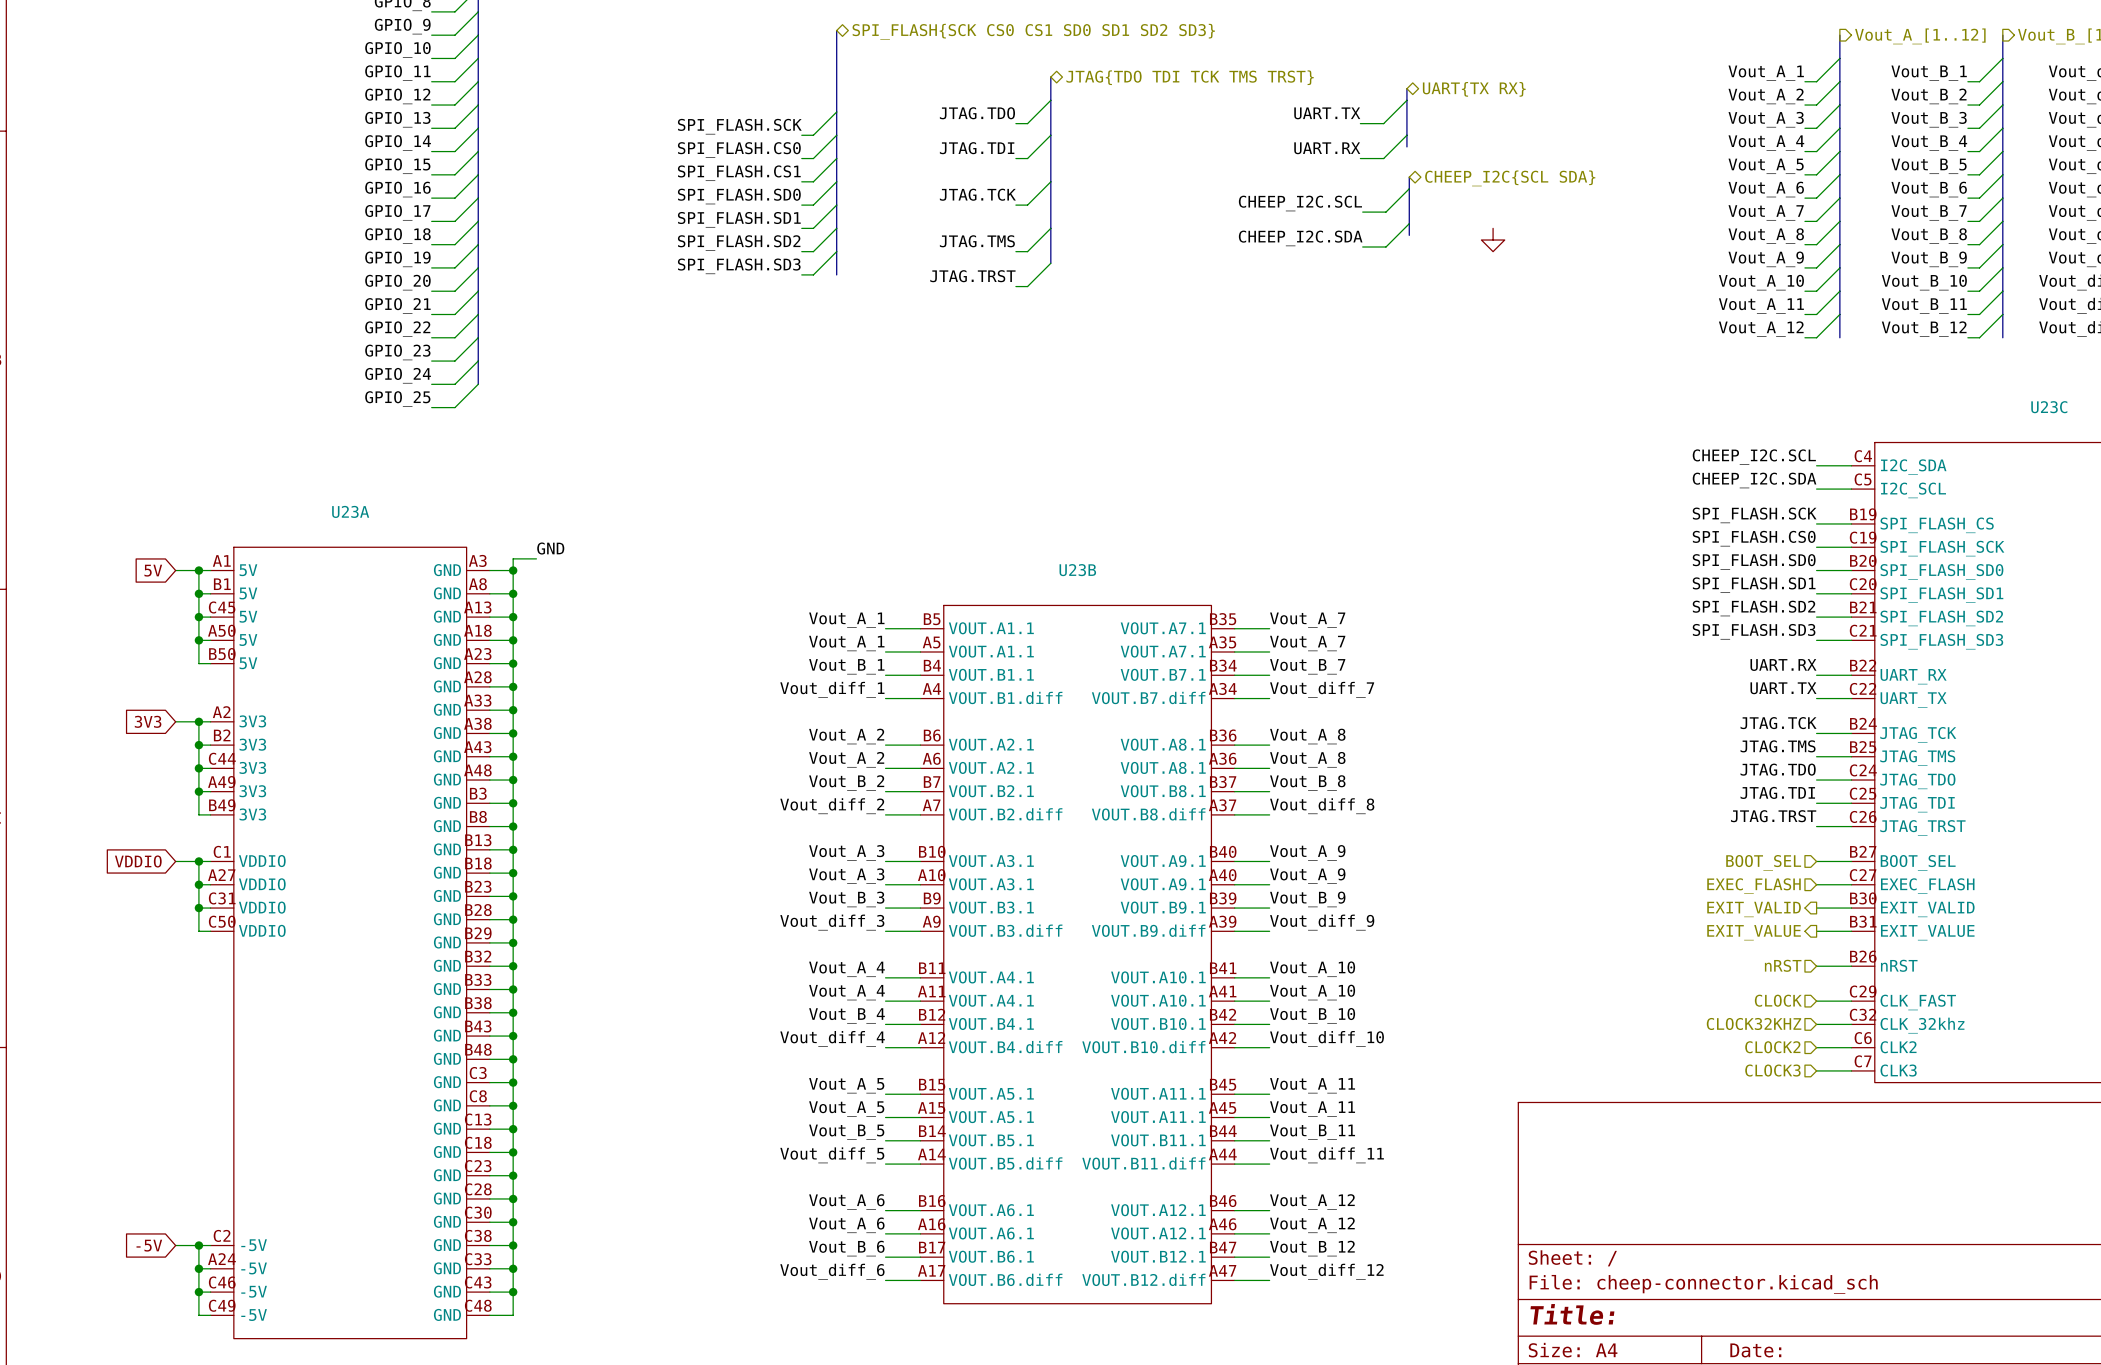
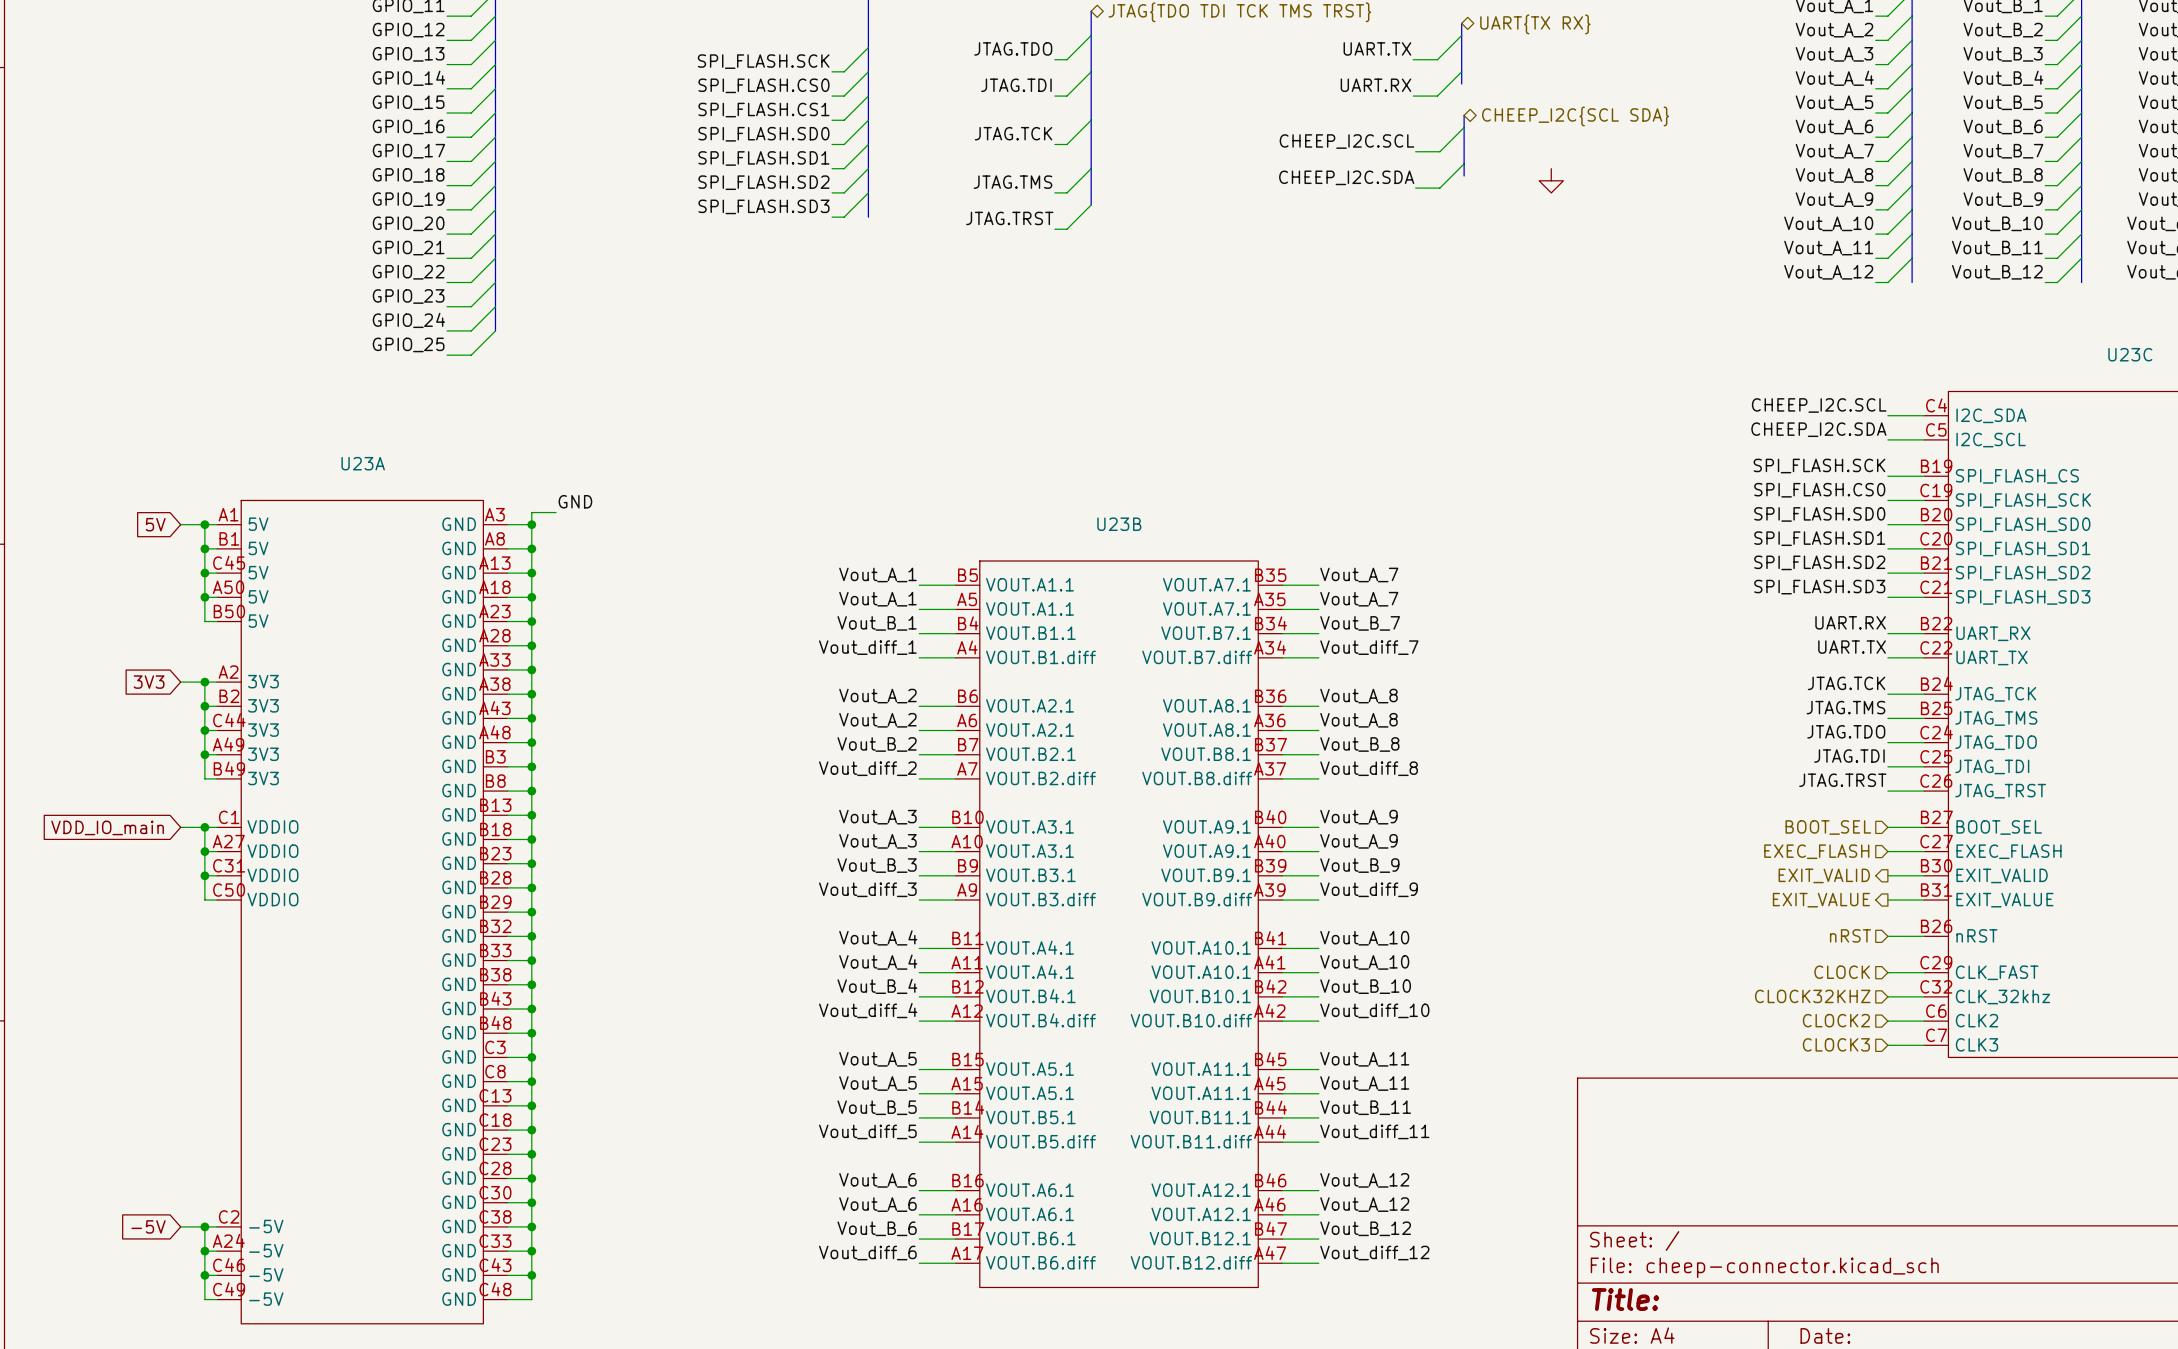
global label: VDDIO (138, 861) -> VDD_IO_main (107, 827)

